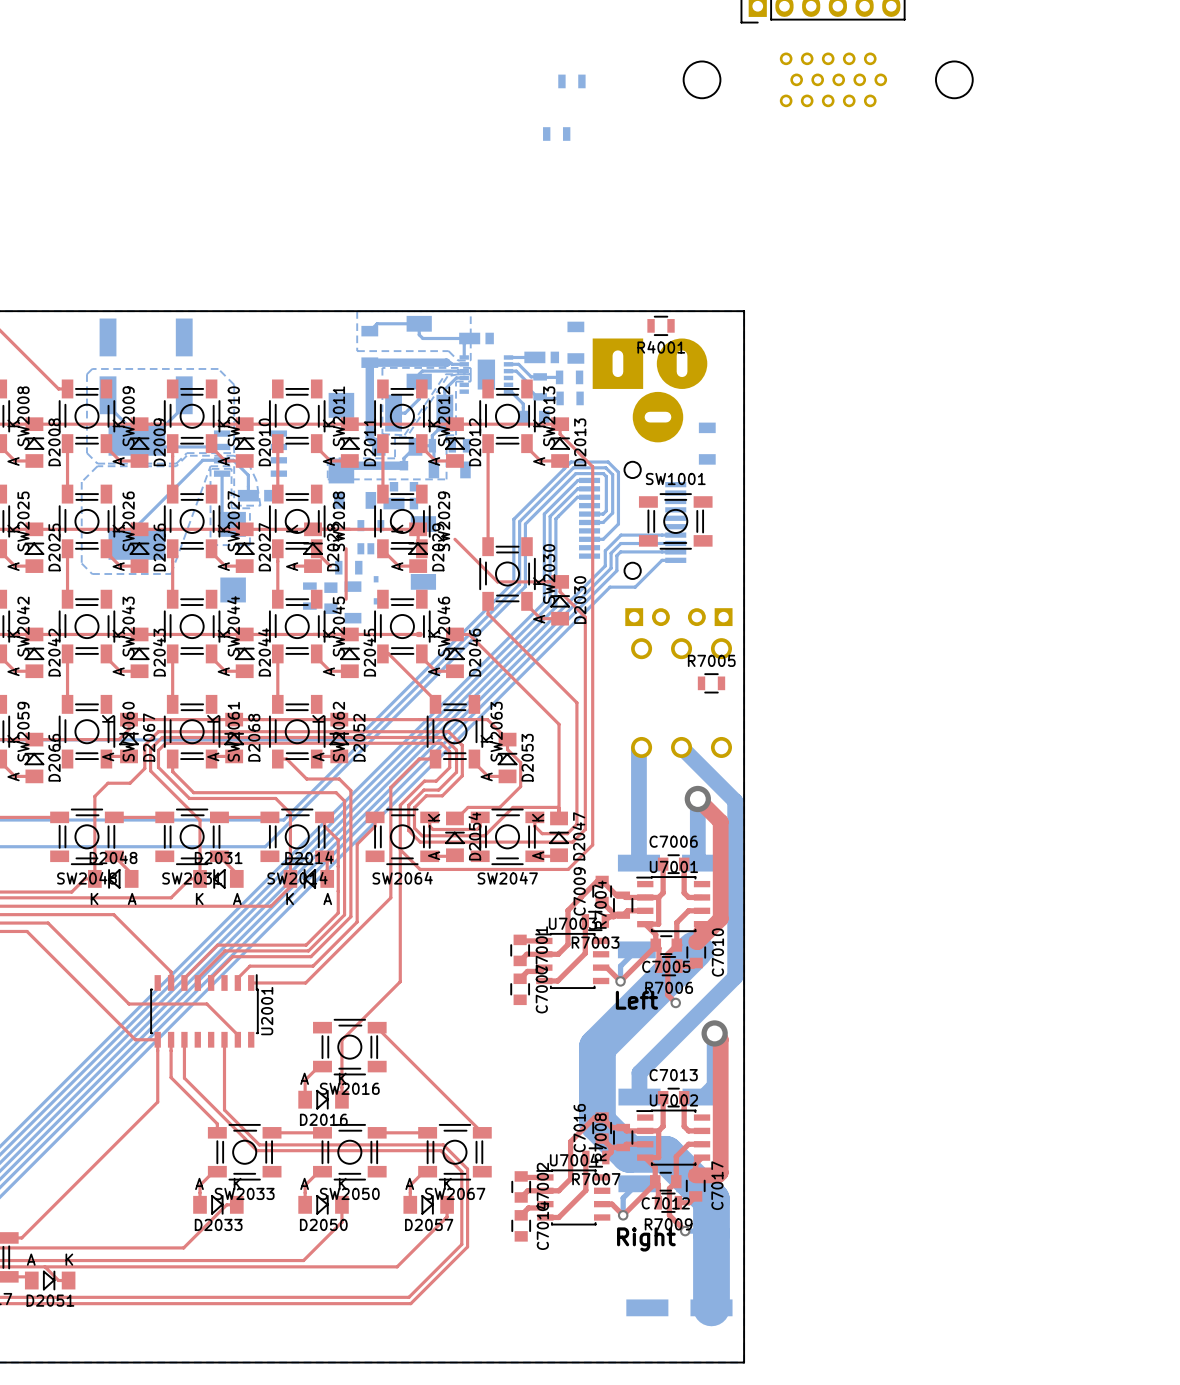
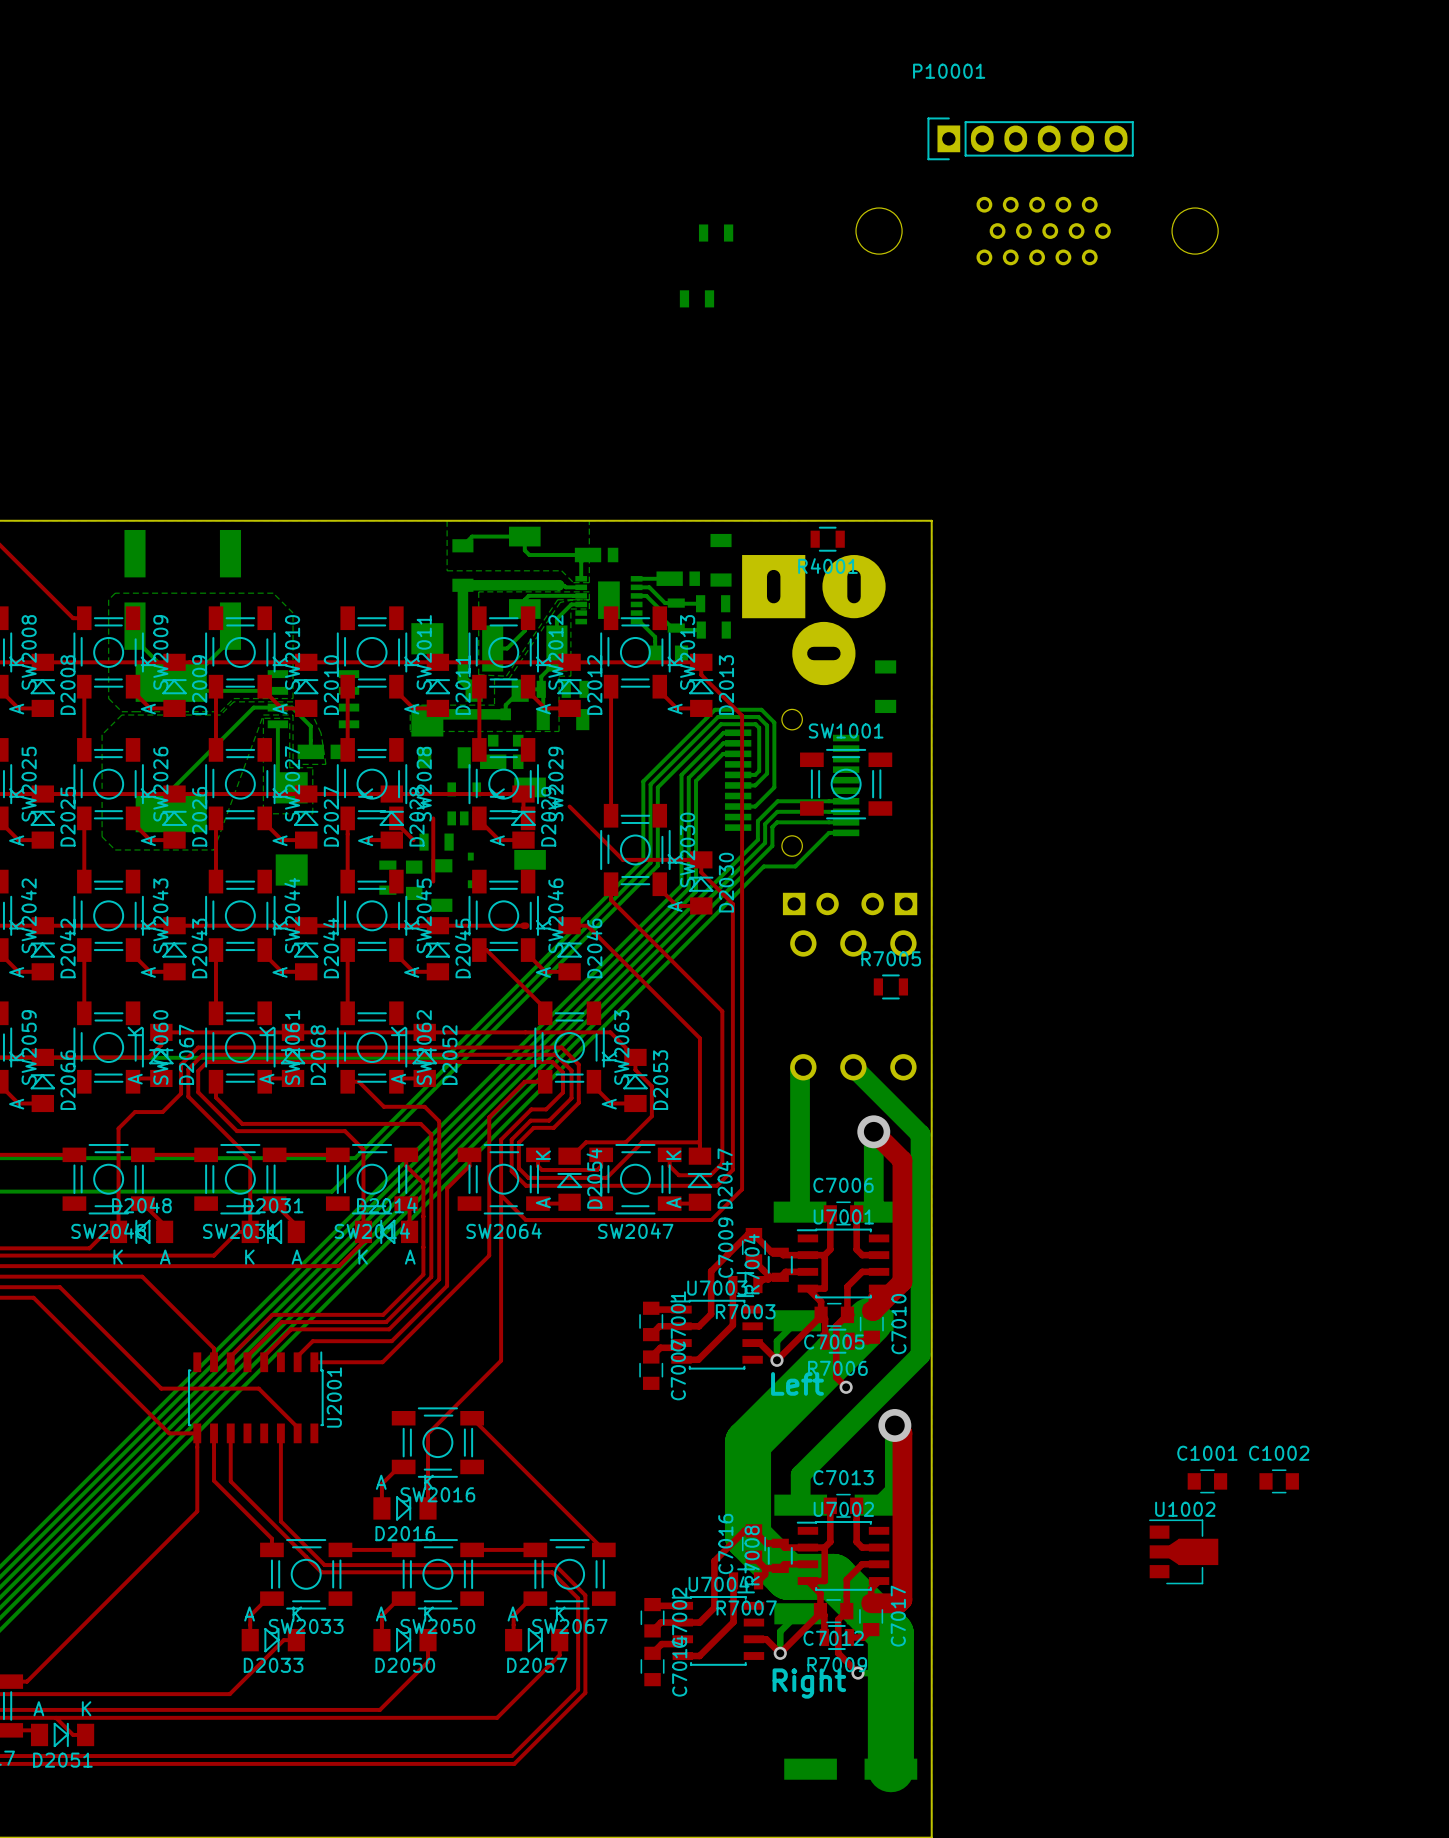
C1001: none -> (1207, 1481)
C1002: none -> (1279, 1481)
U1002: none -> (1183, 1551)

